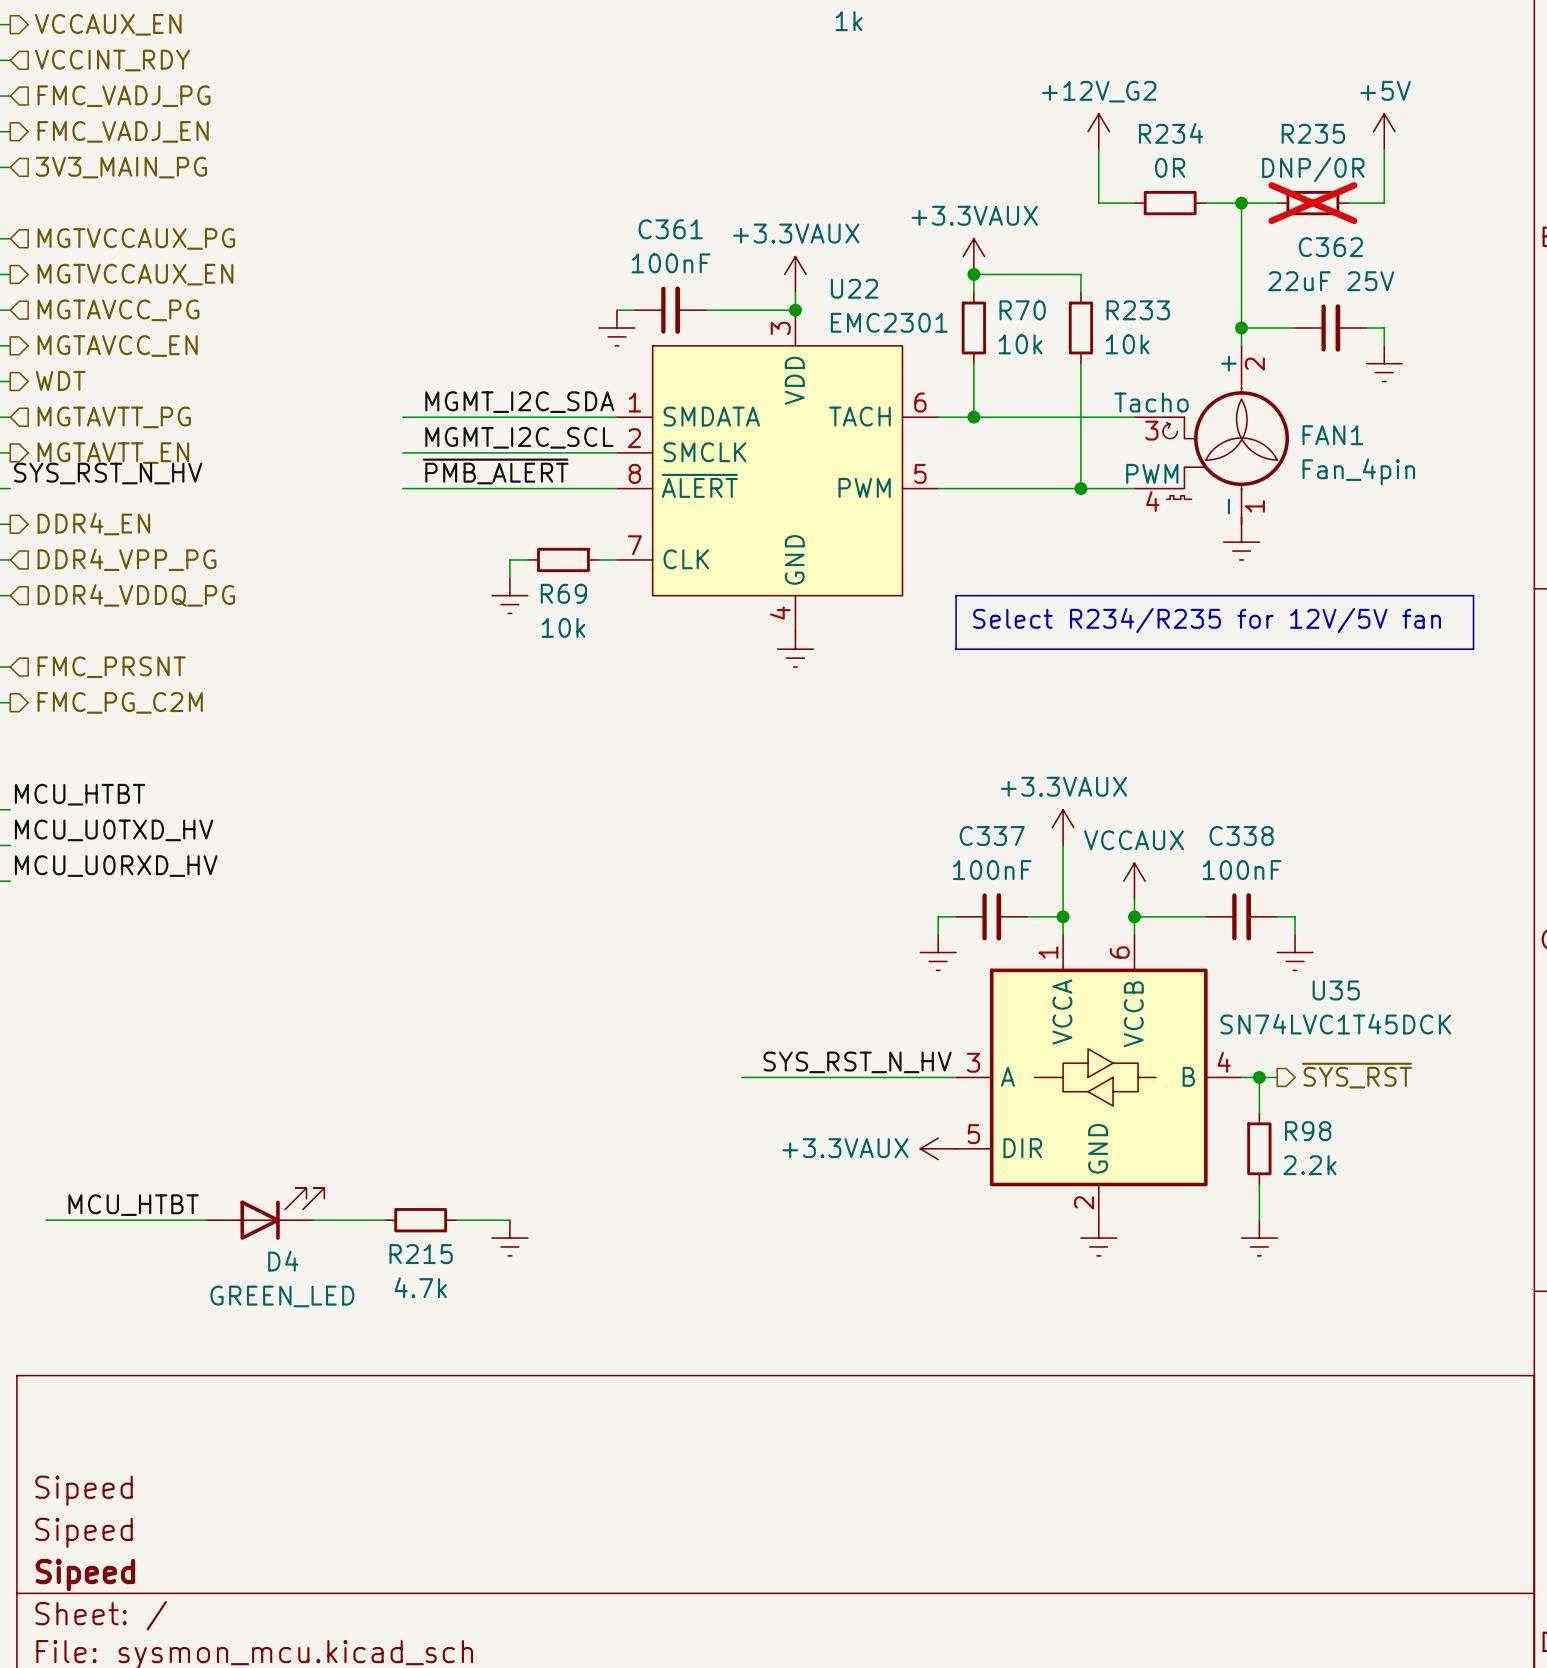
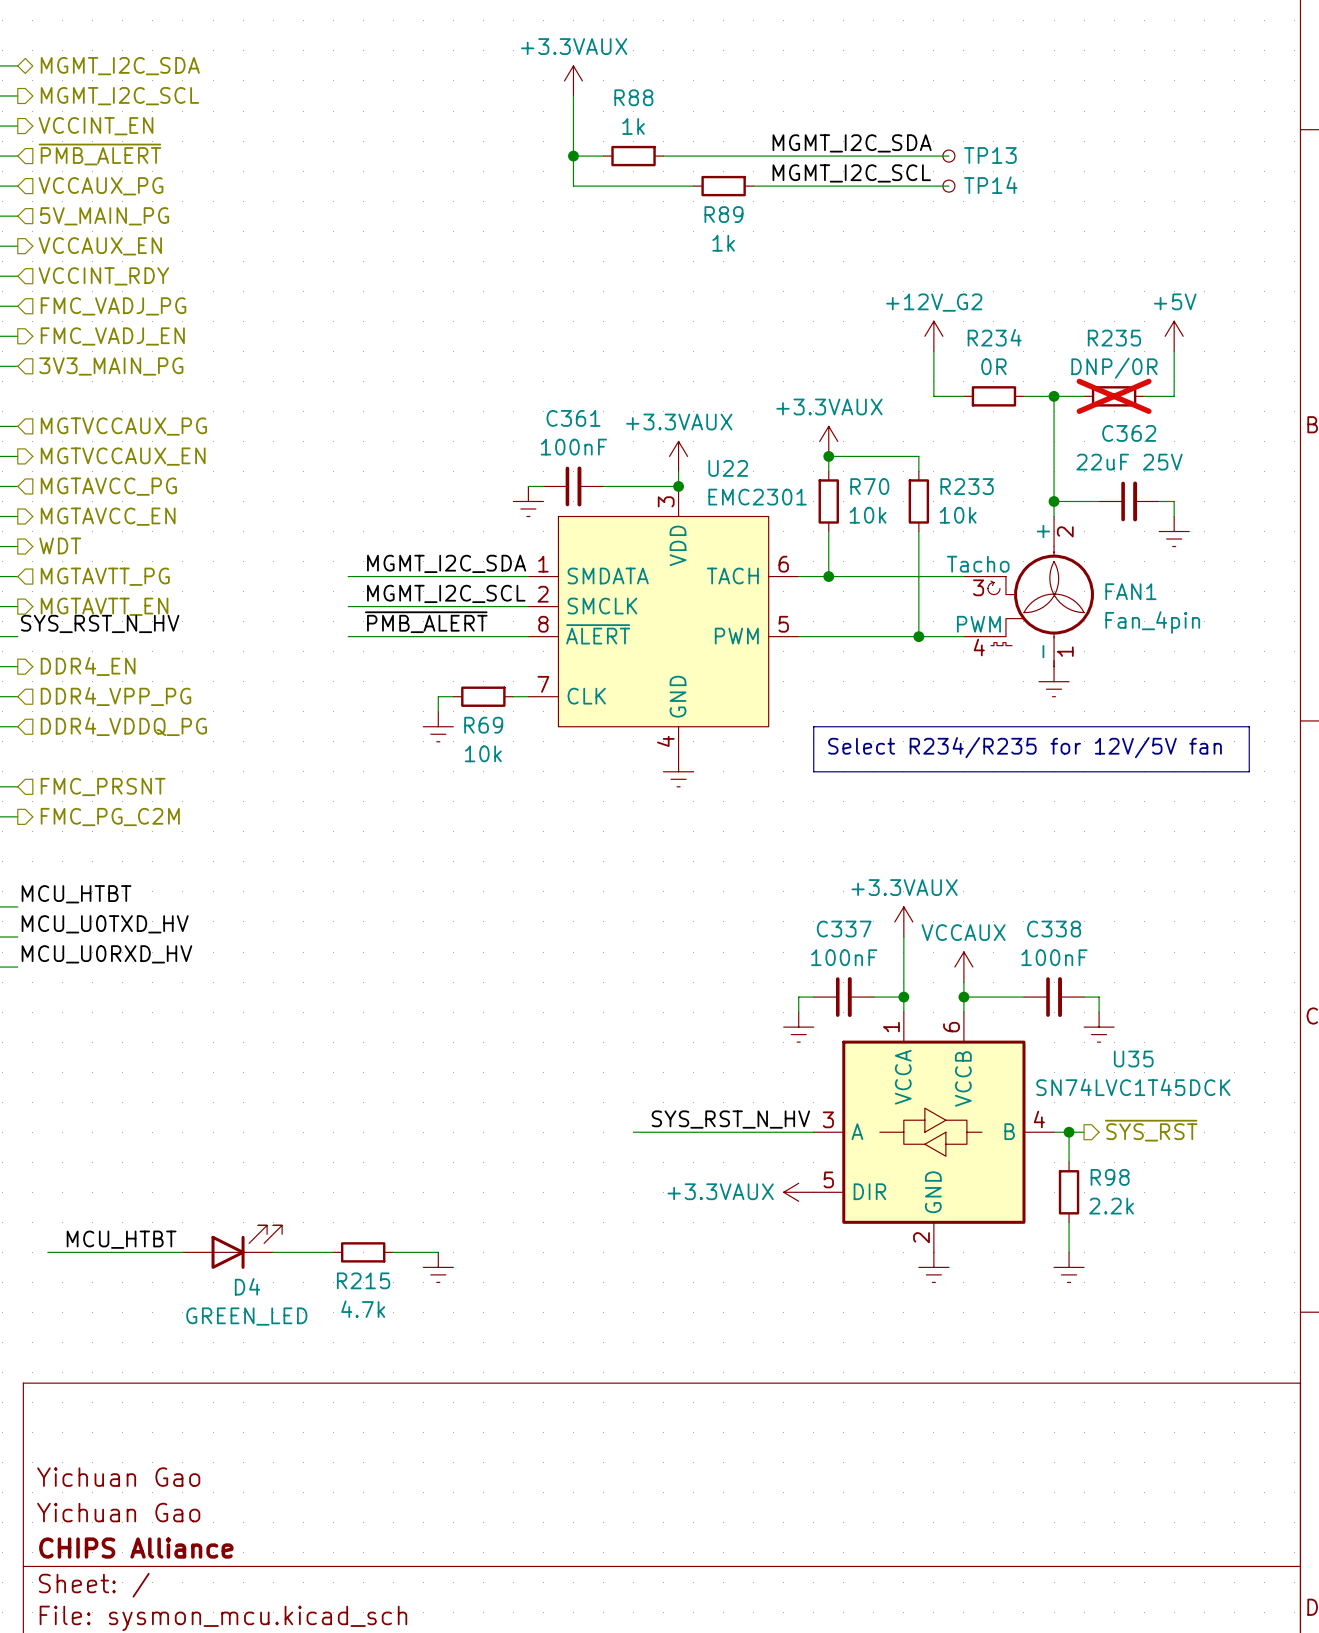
title block: Sipeed (84, 1490) -> Yichuan Gao (118, 1477)
title block: Sipeed (84, 1532) -> Yichuan Gao (118, 1512)
title block: Sipeed (85, 1575) -> CHIPS Alliance (136, 1548)

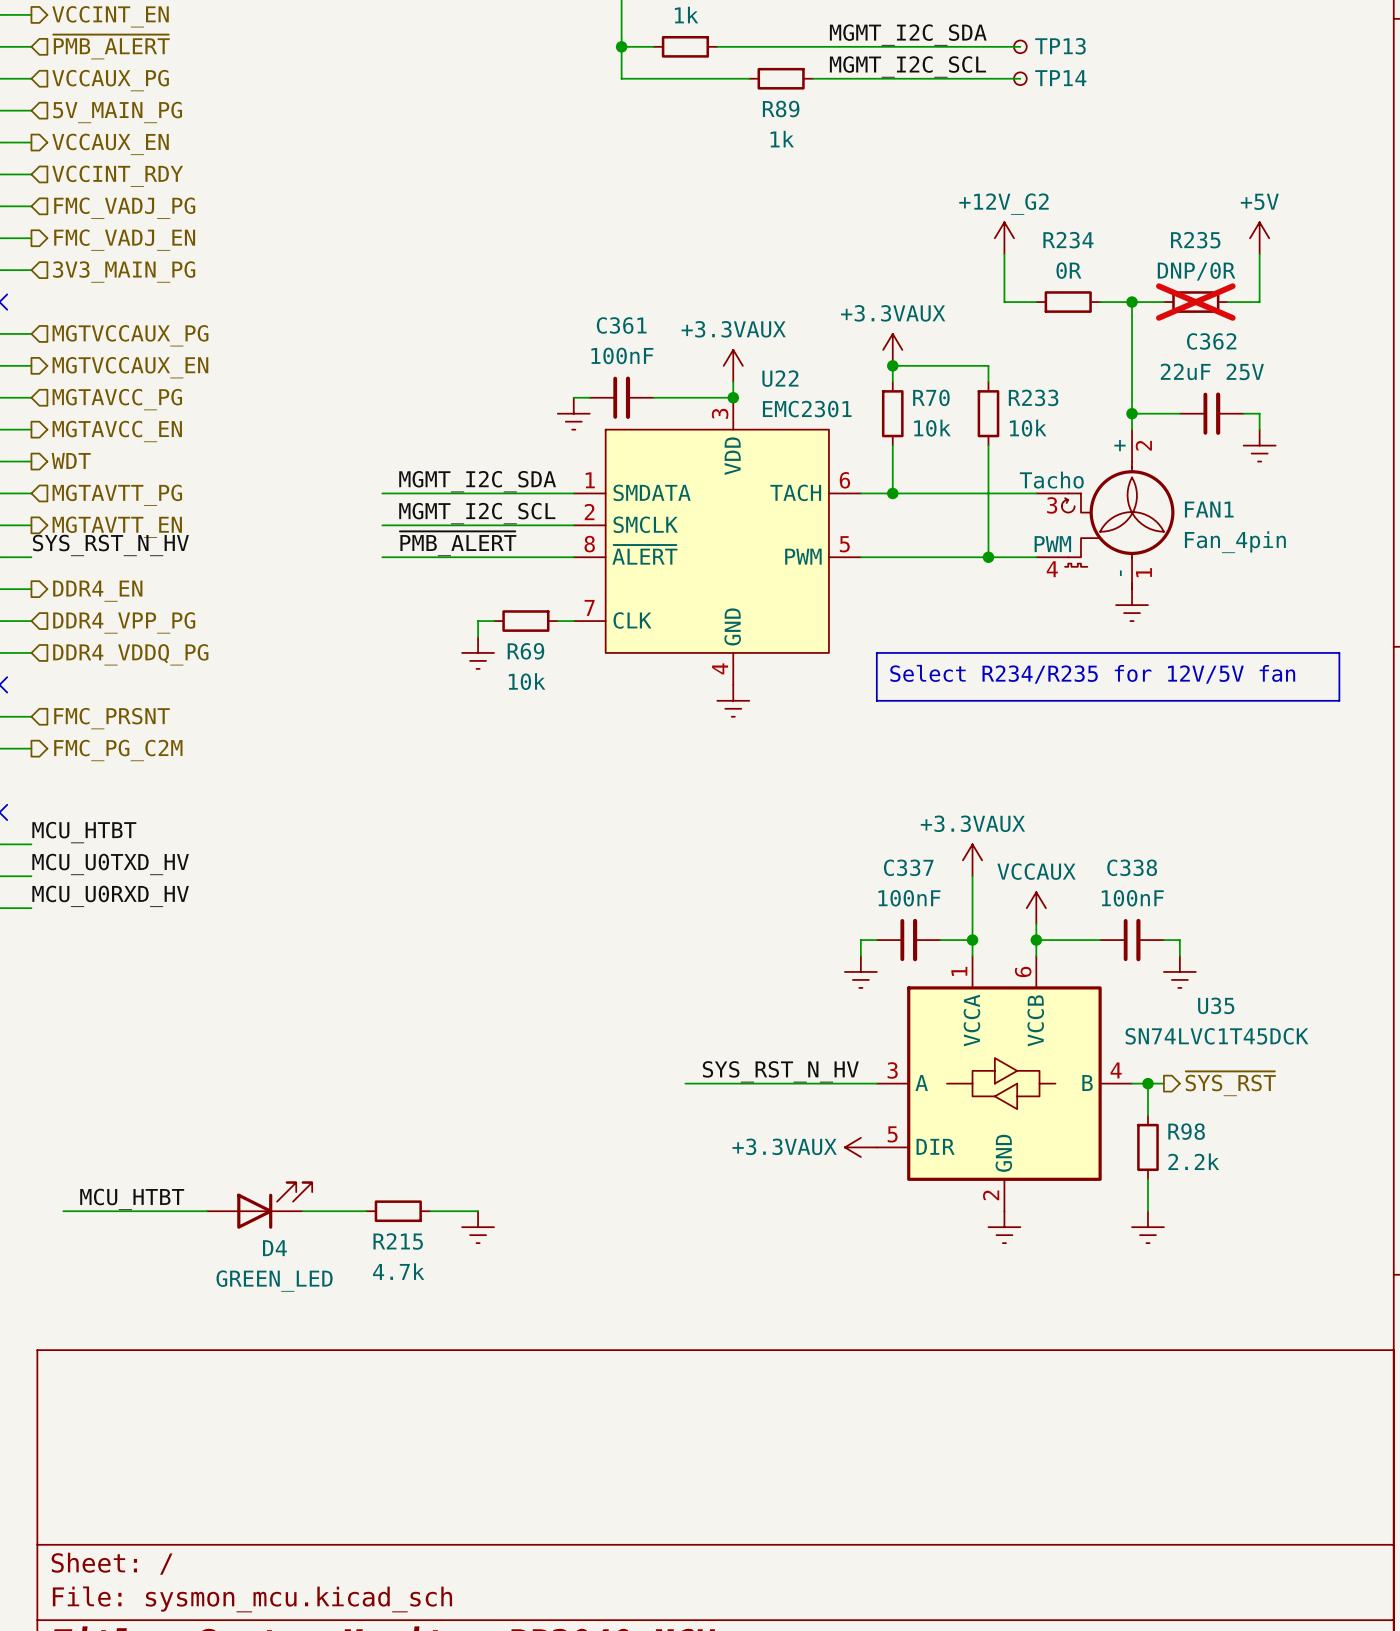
title block: Yichuan Gao (118, 1477) -> none
title block: Yichuan Gao (118, 1512) -> none
title block: CHIPS Alliance (136, 1548) -> none

